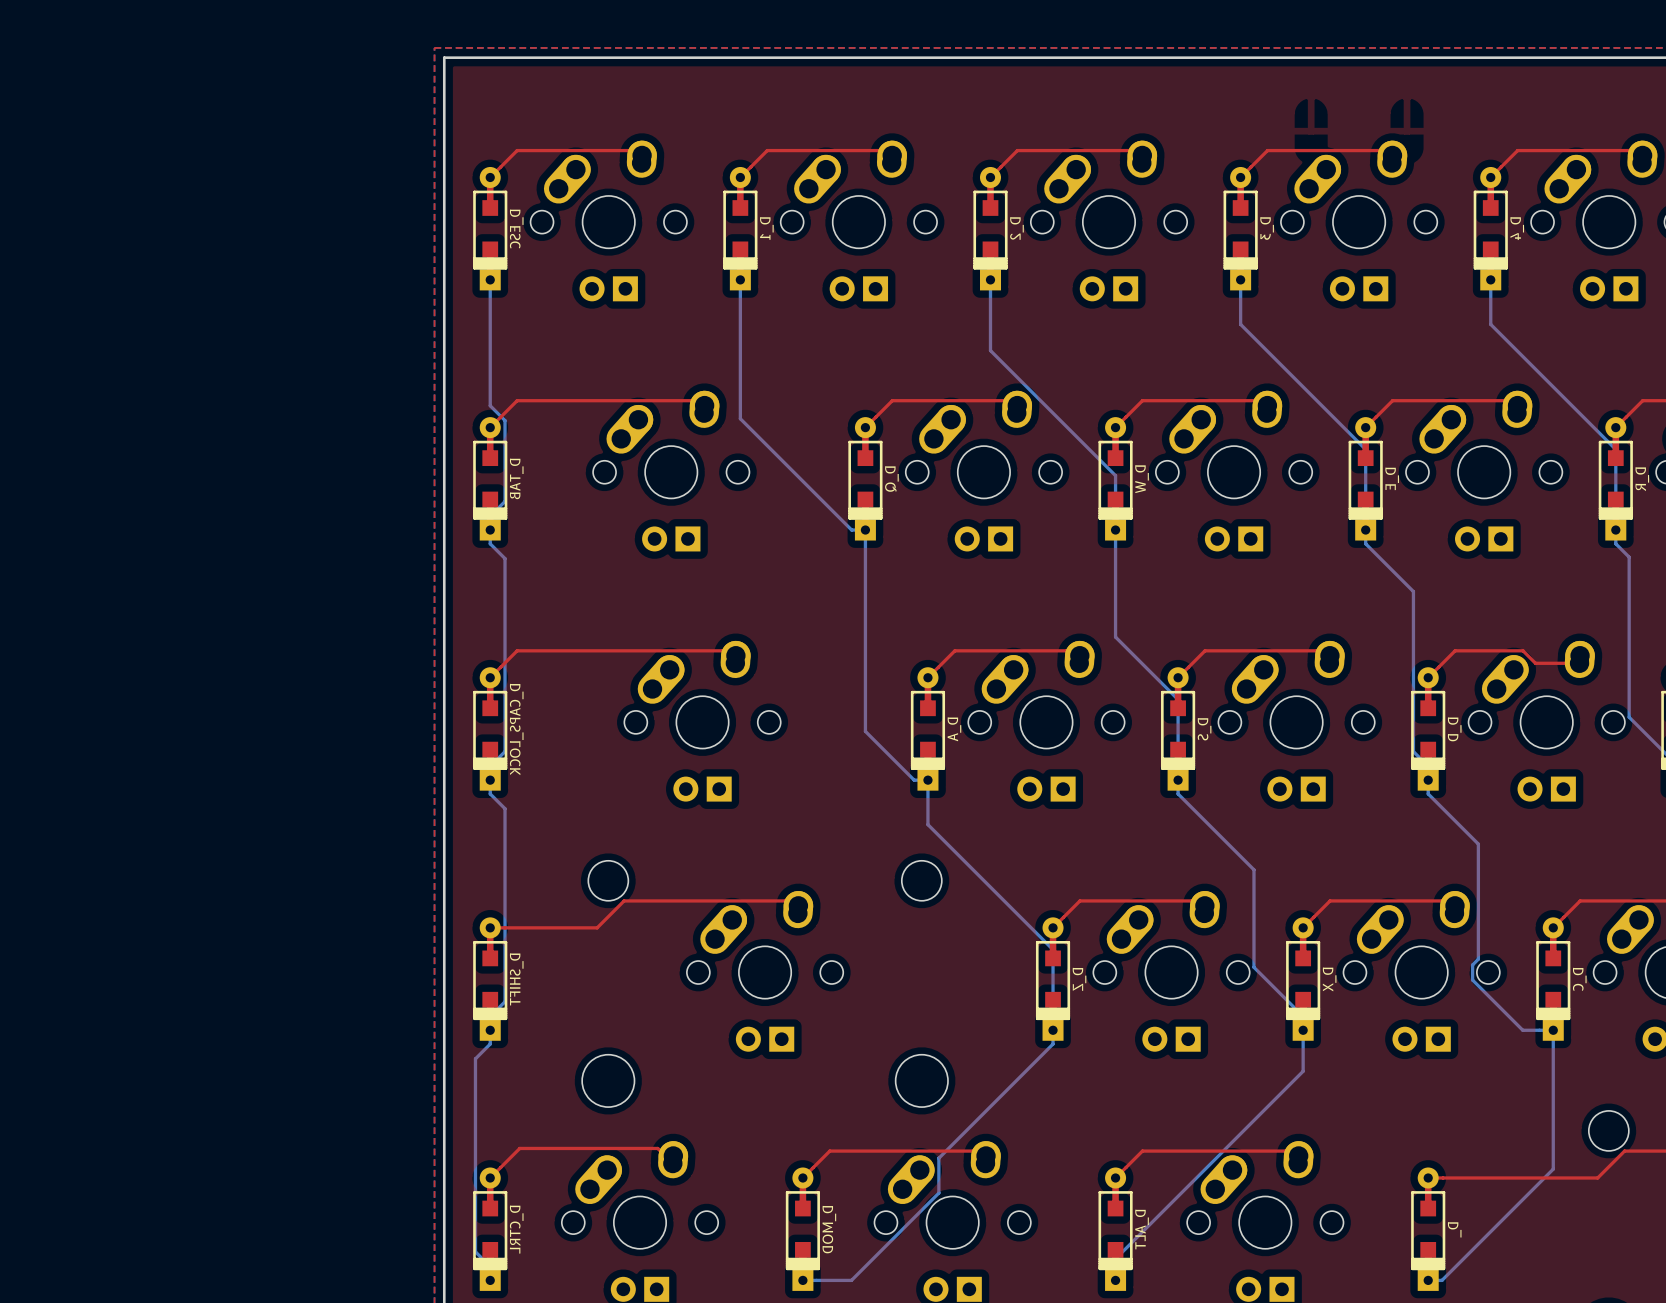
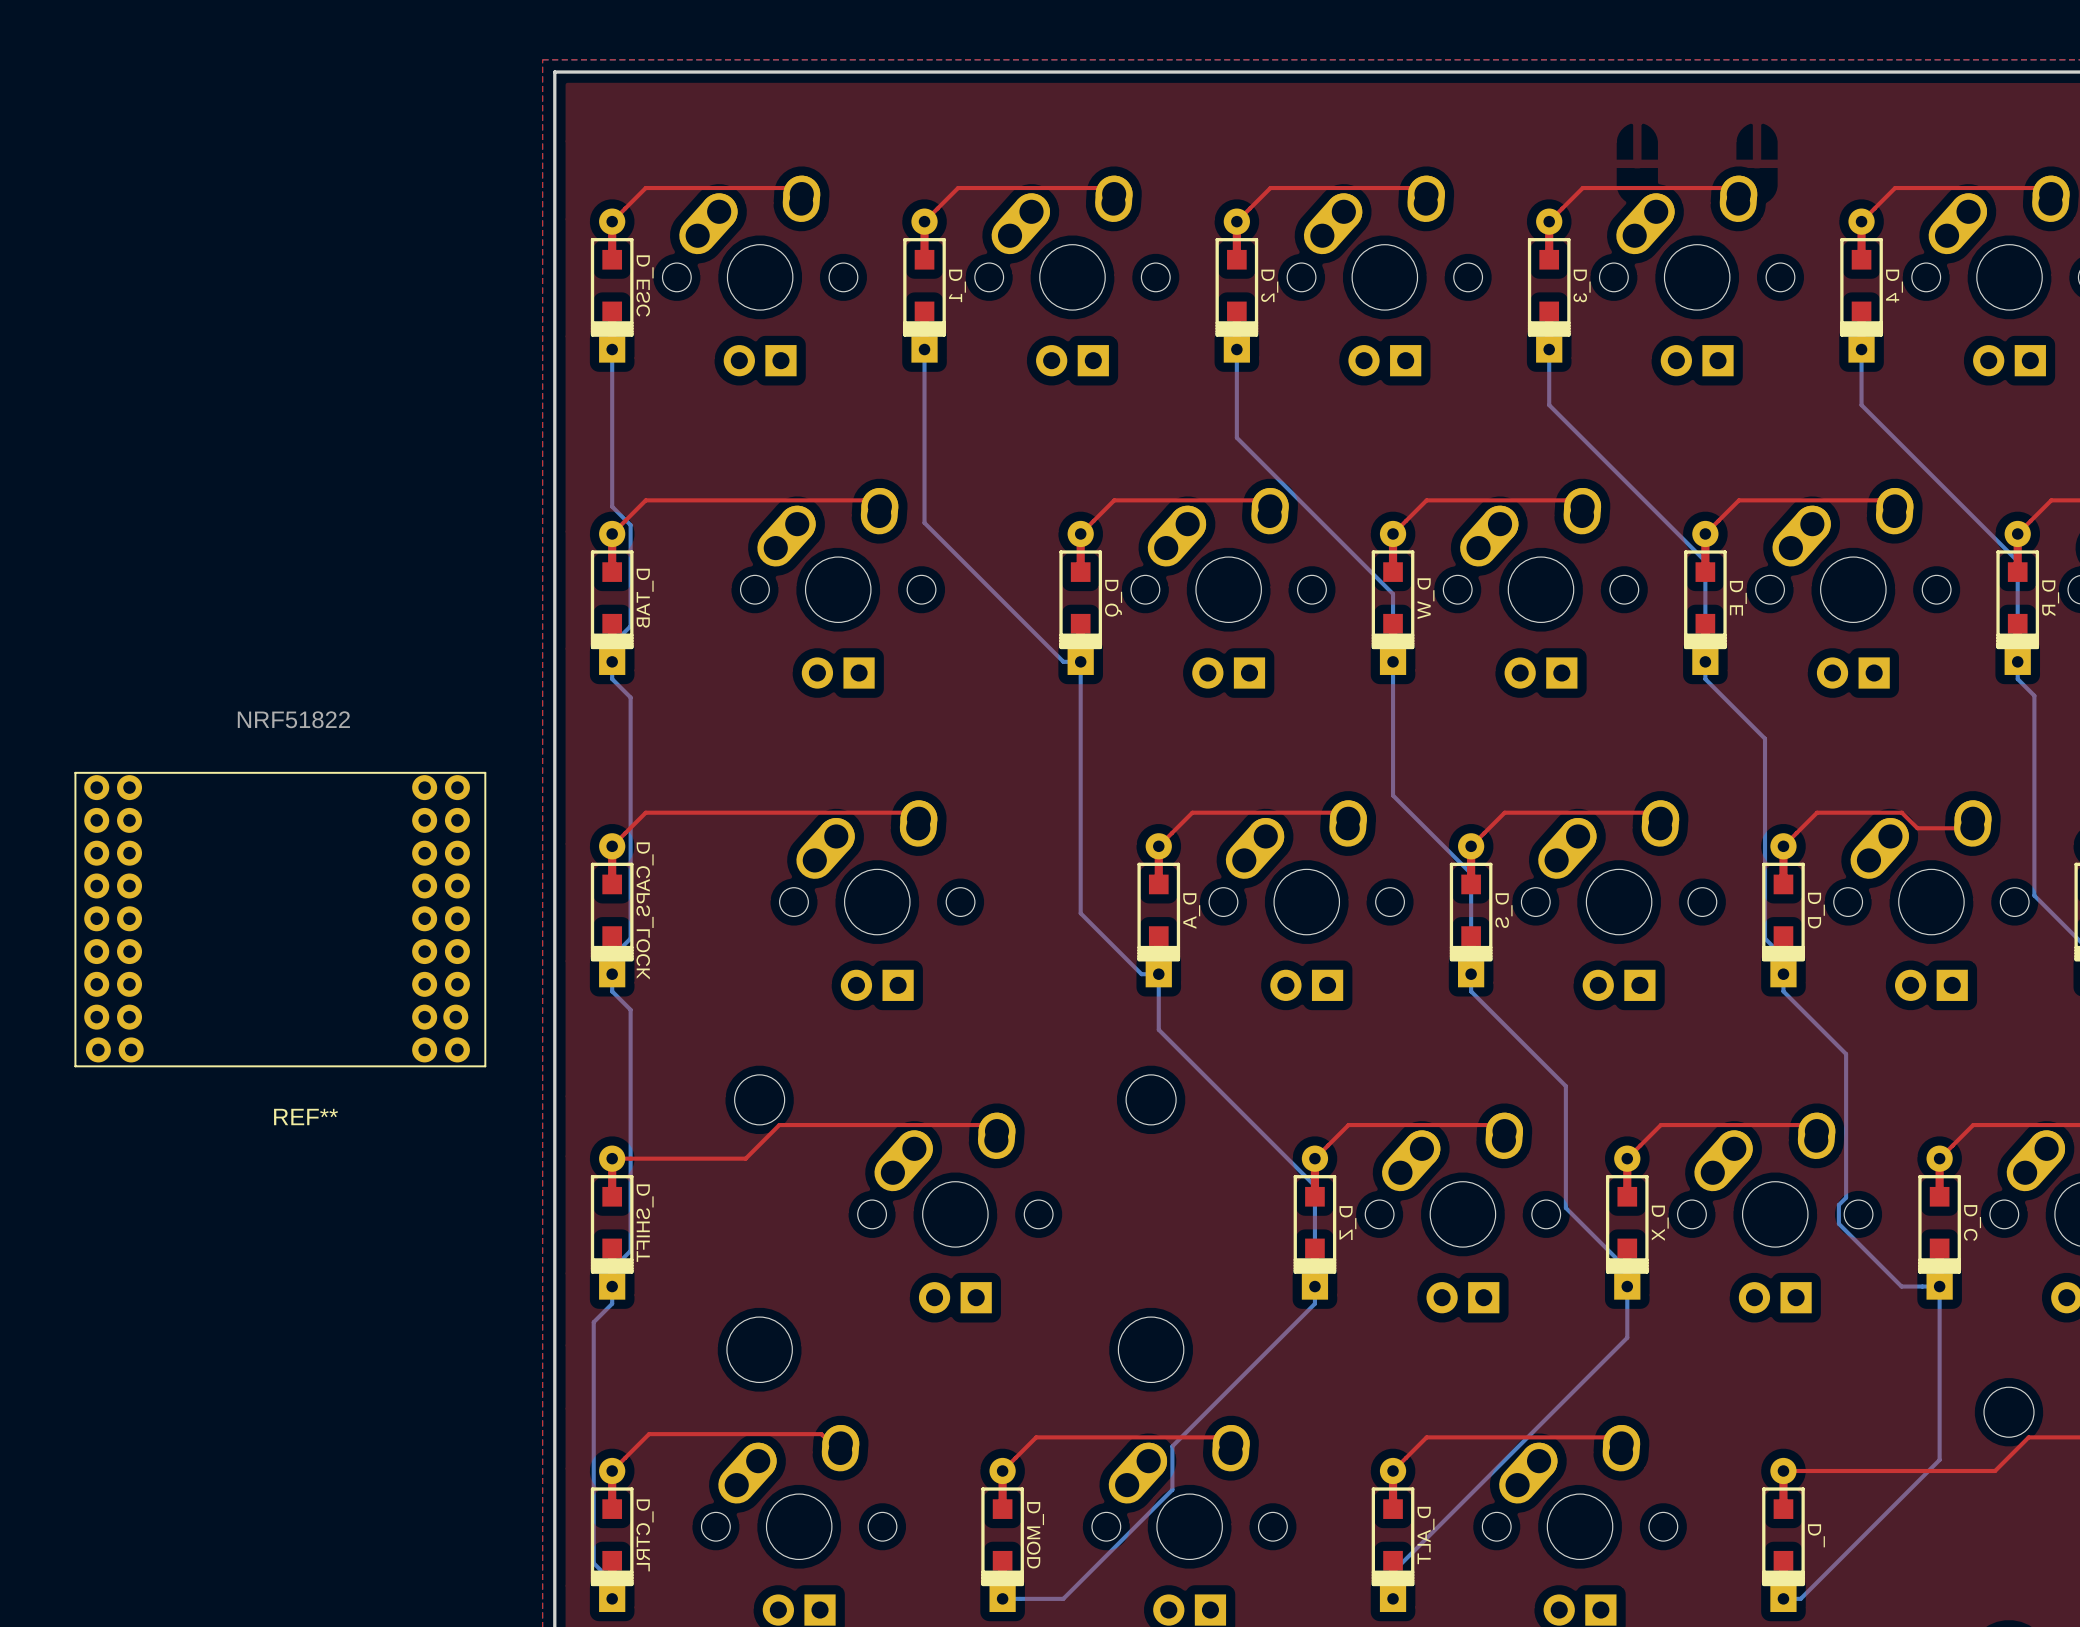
REF**: none -> NRF51822 (280, 919)

